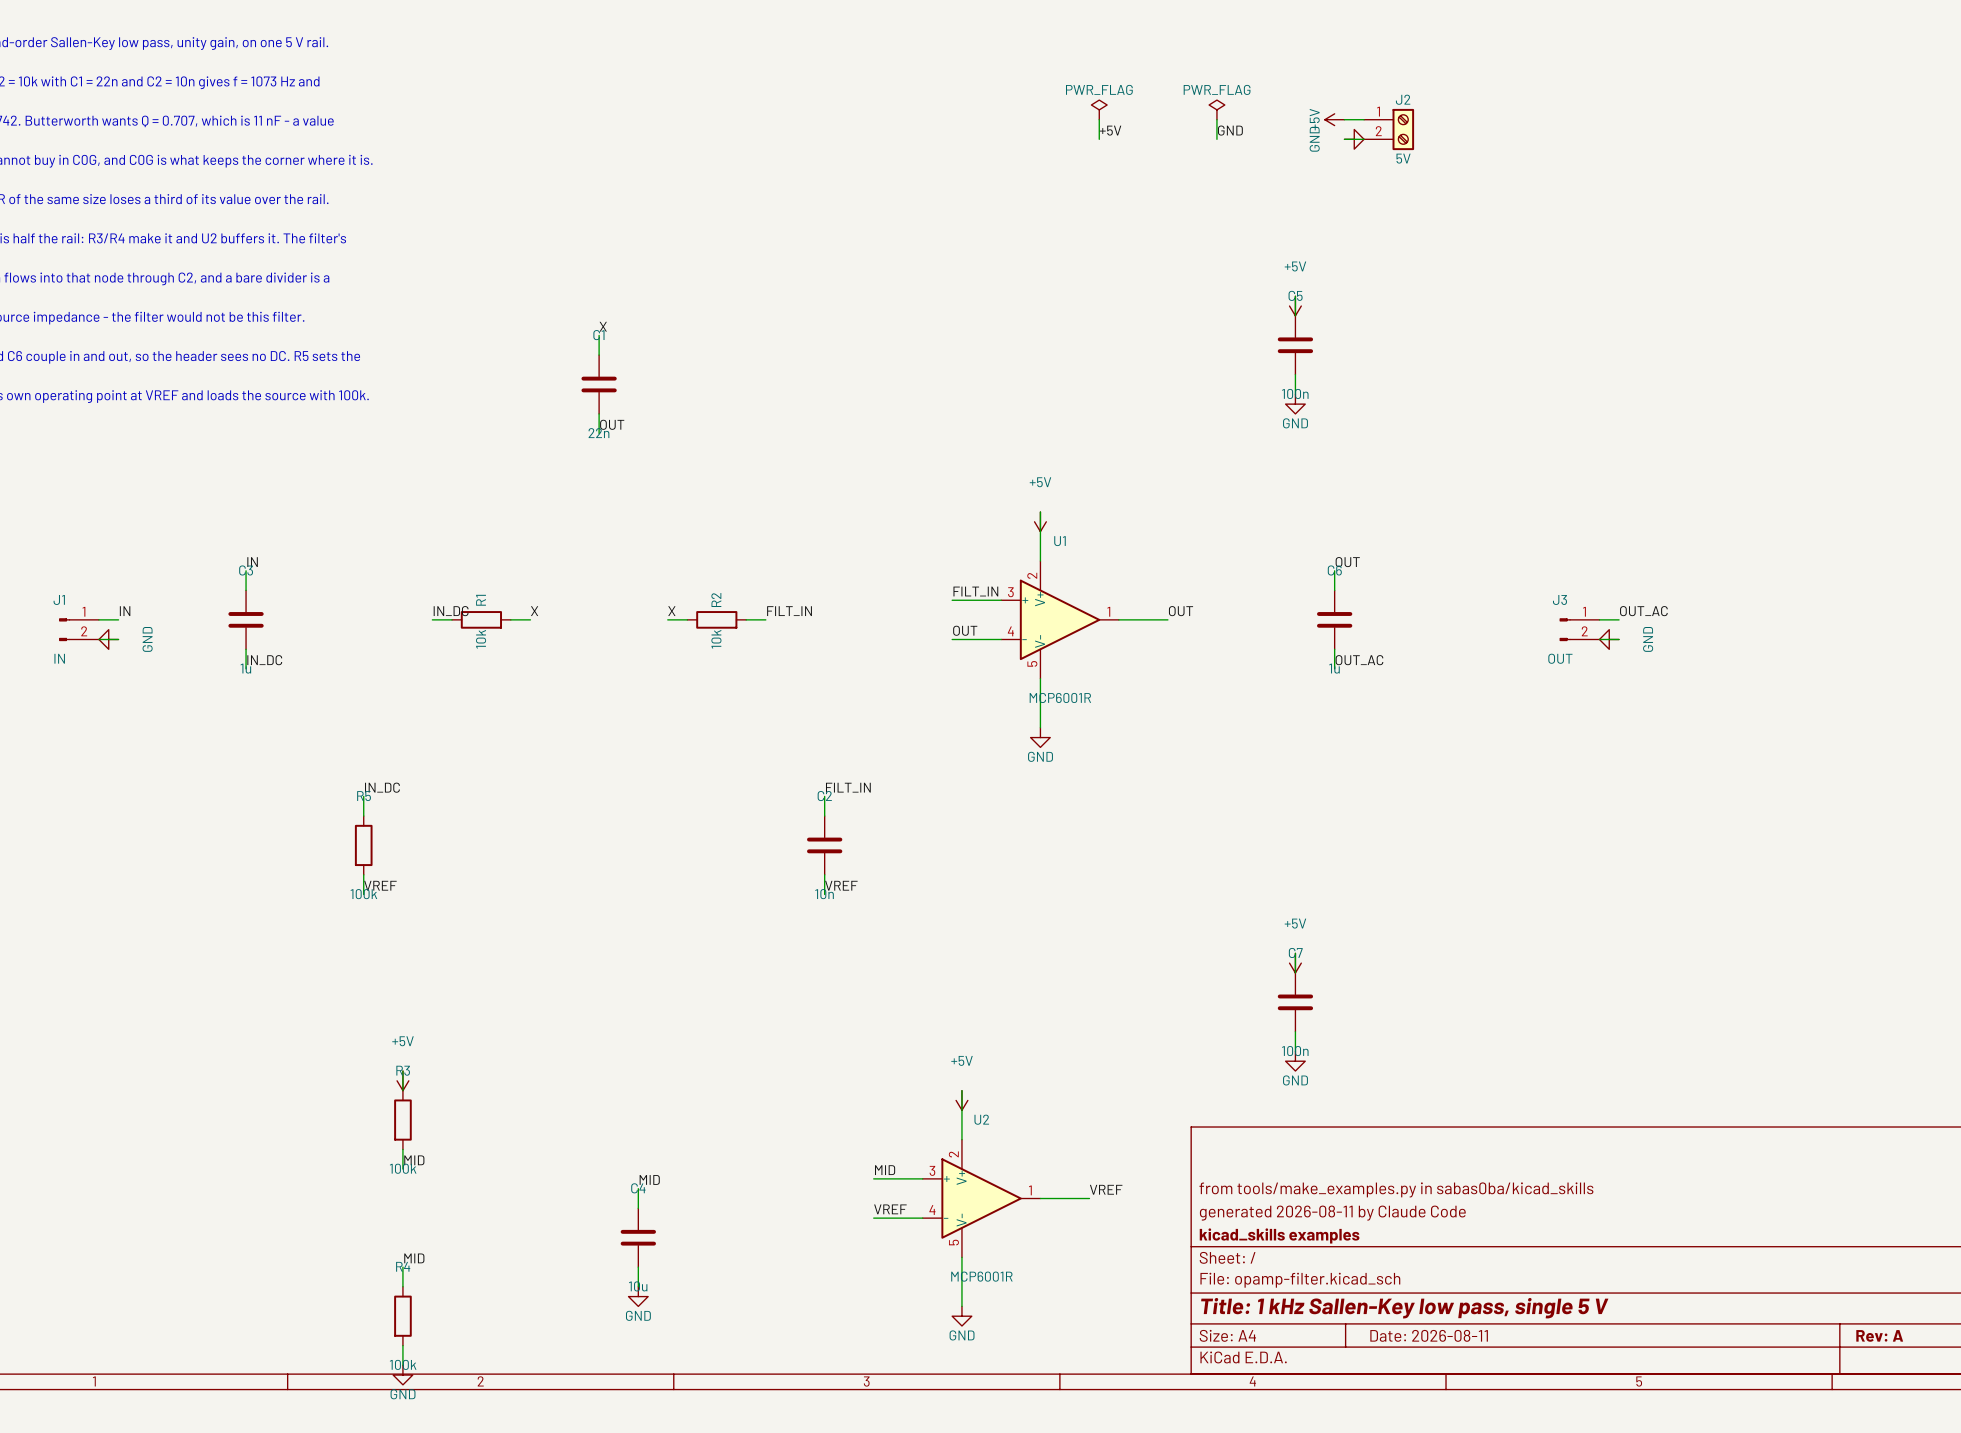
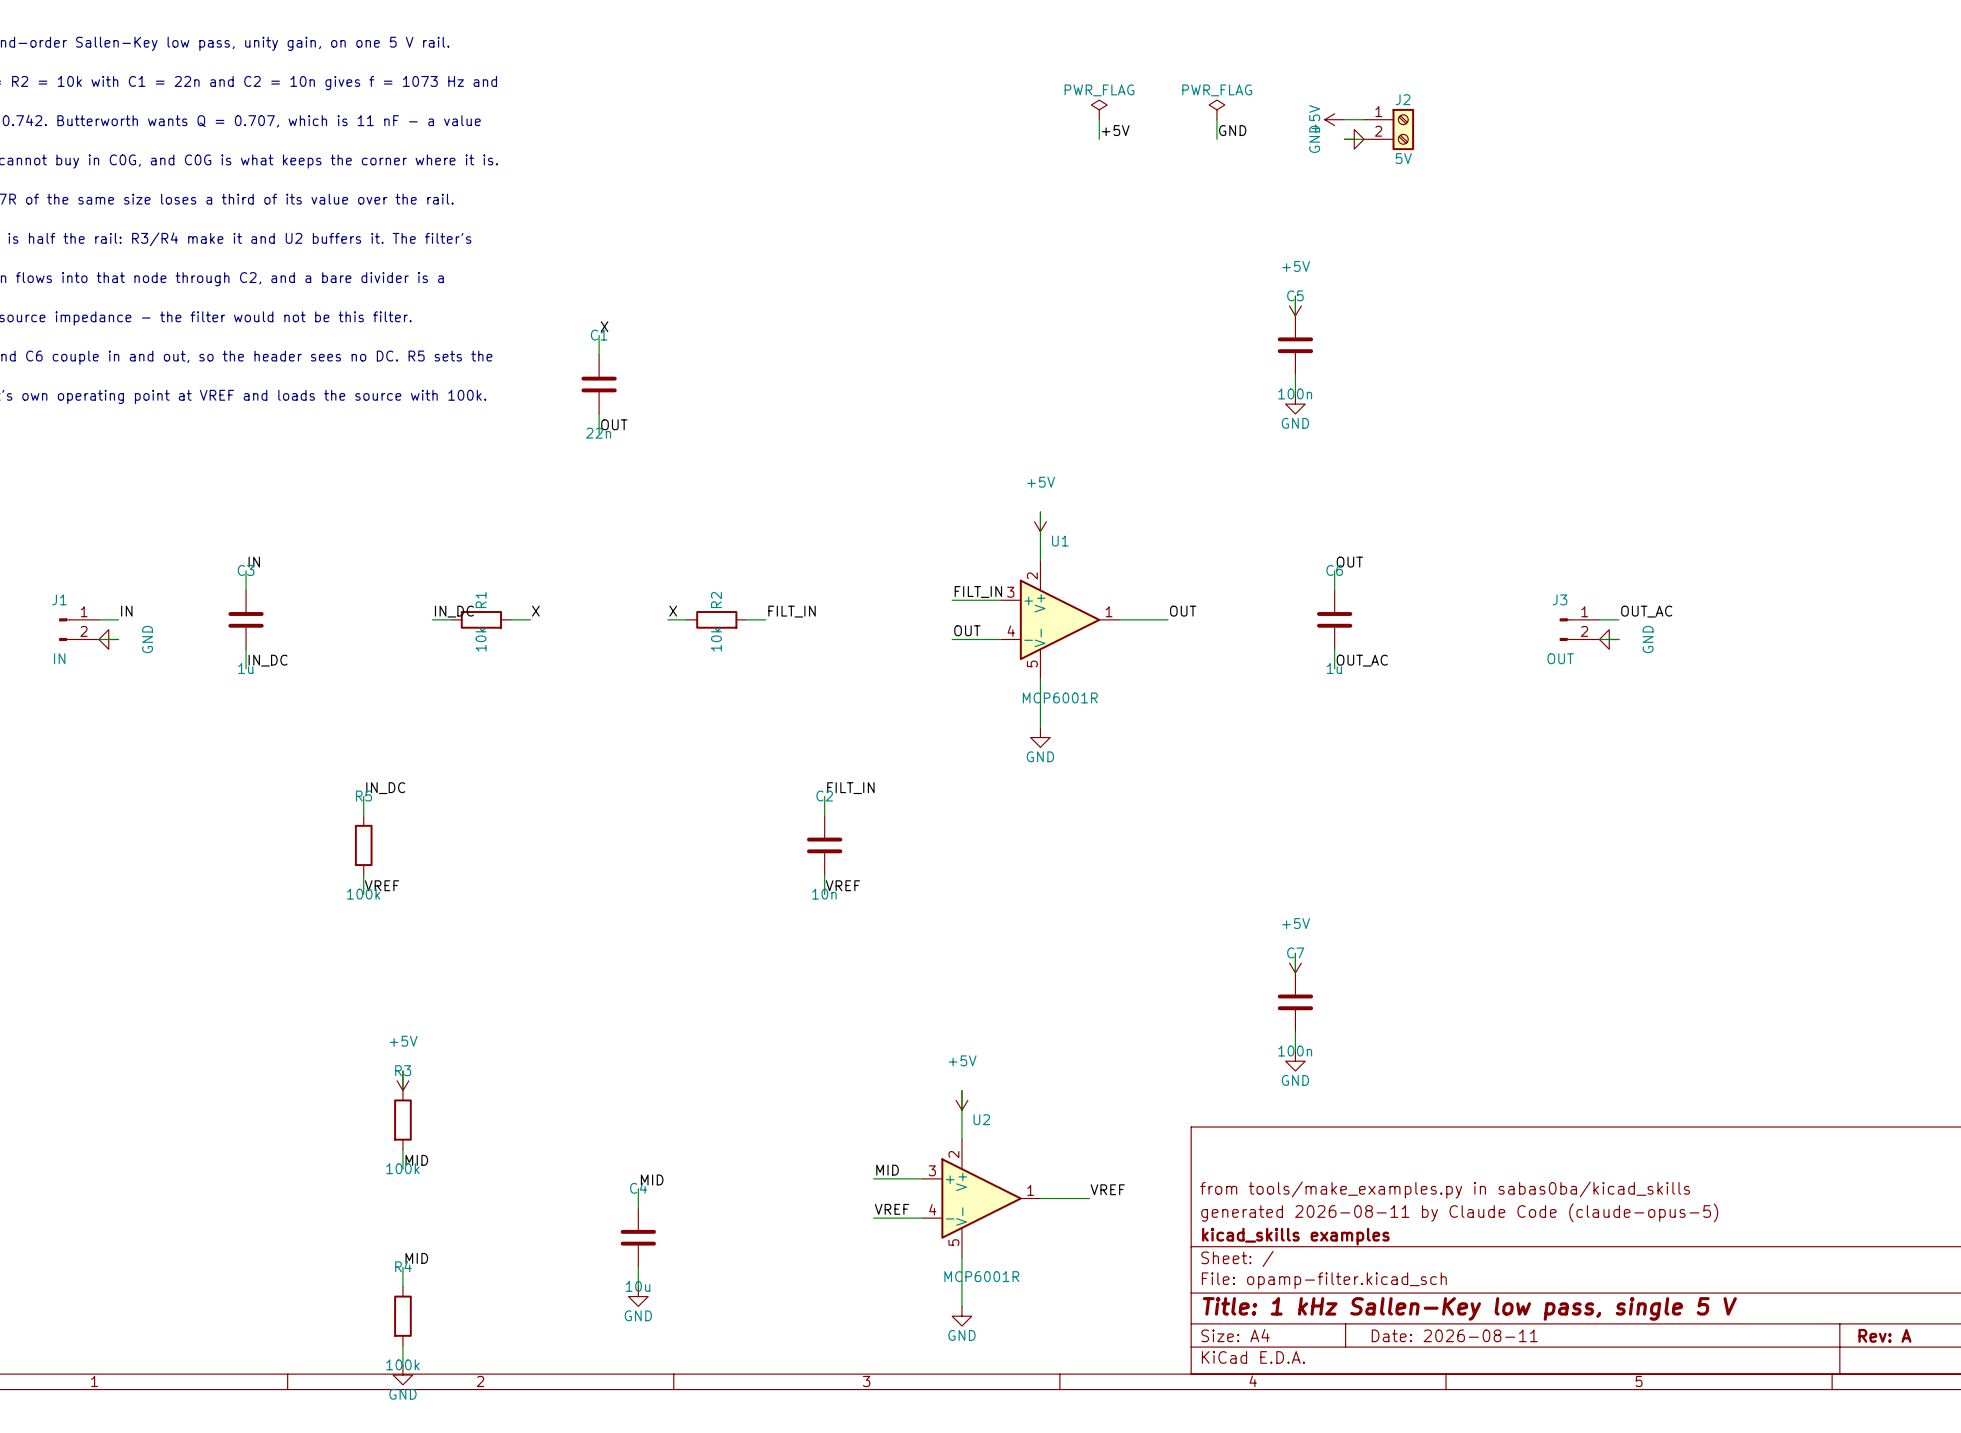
title block: generated 2026-08-11 by Claude Code (1332, 1213) -> generated 2026-08-11 by Claude Code (claude-opus-5) (1459, 1212)

